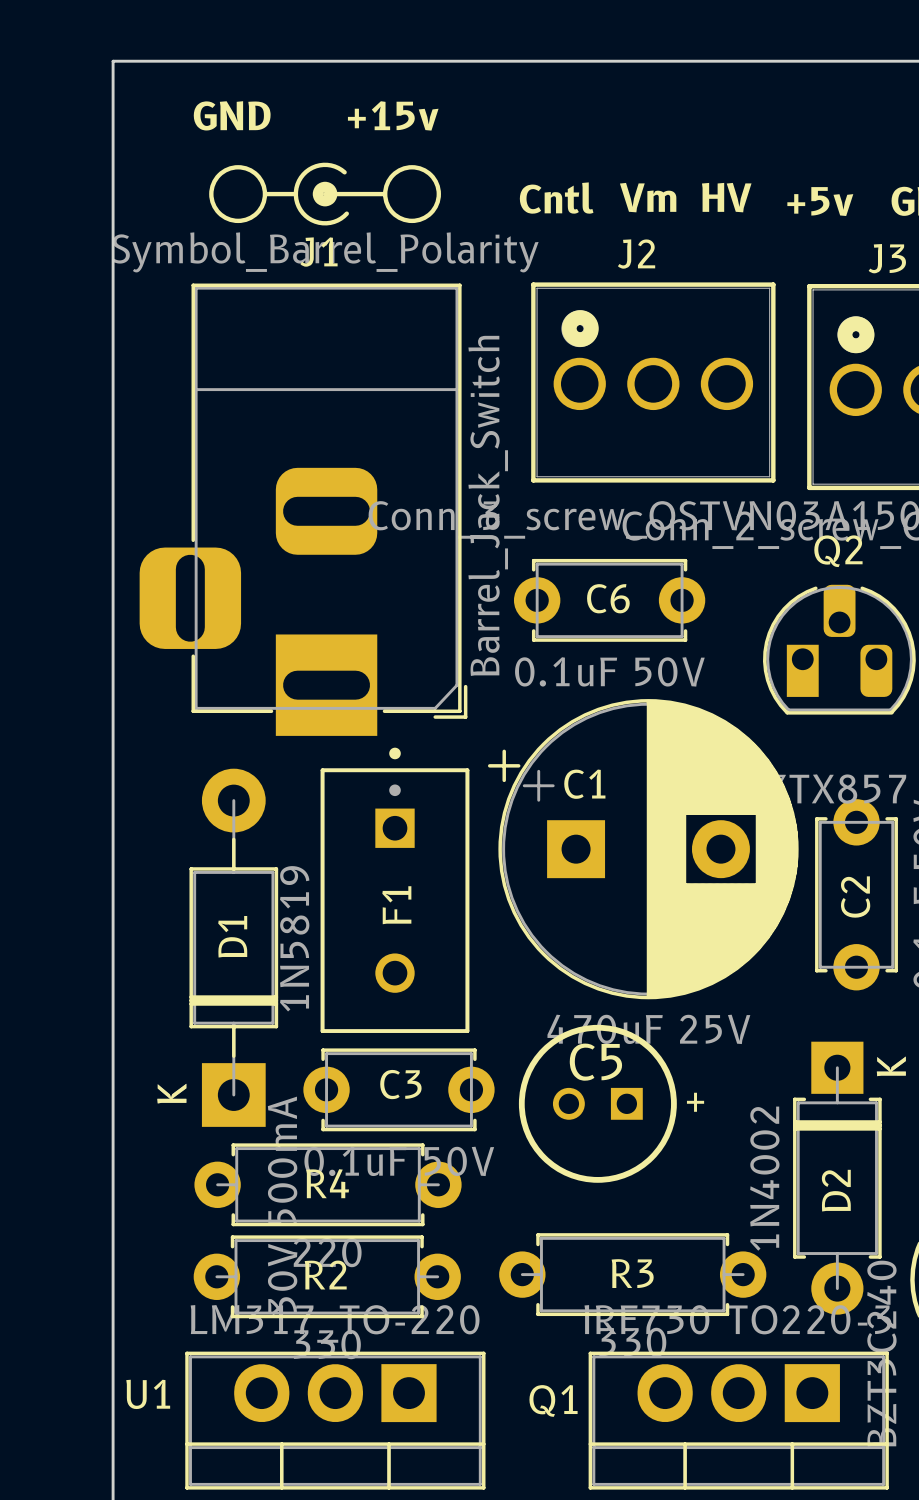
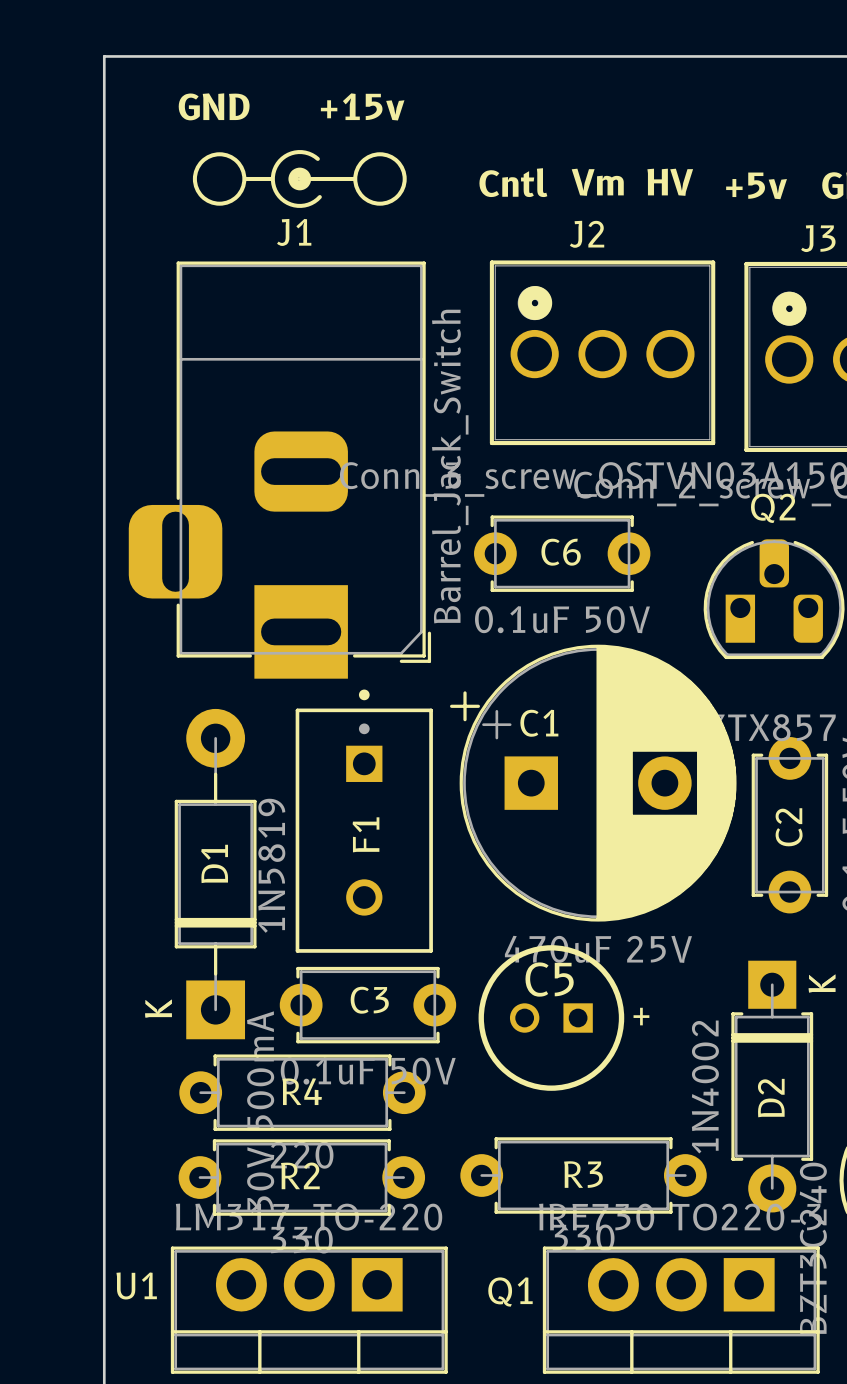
drawing shape: [112, 162, 539, 273] -> [192, 150, 407, 208]

